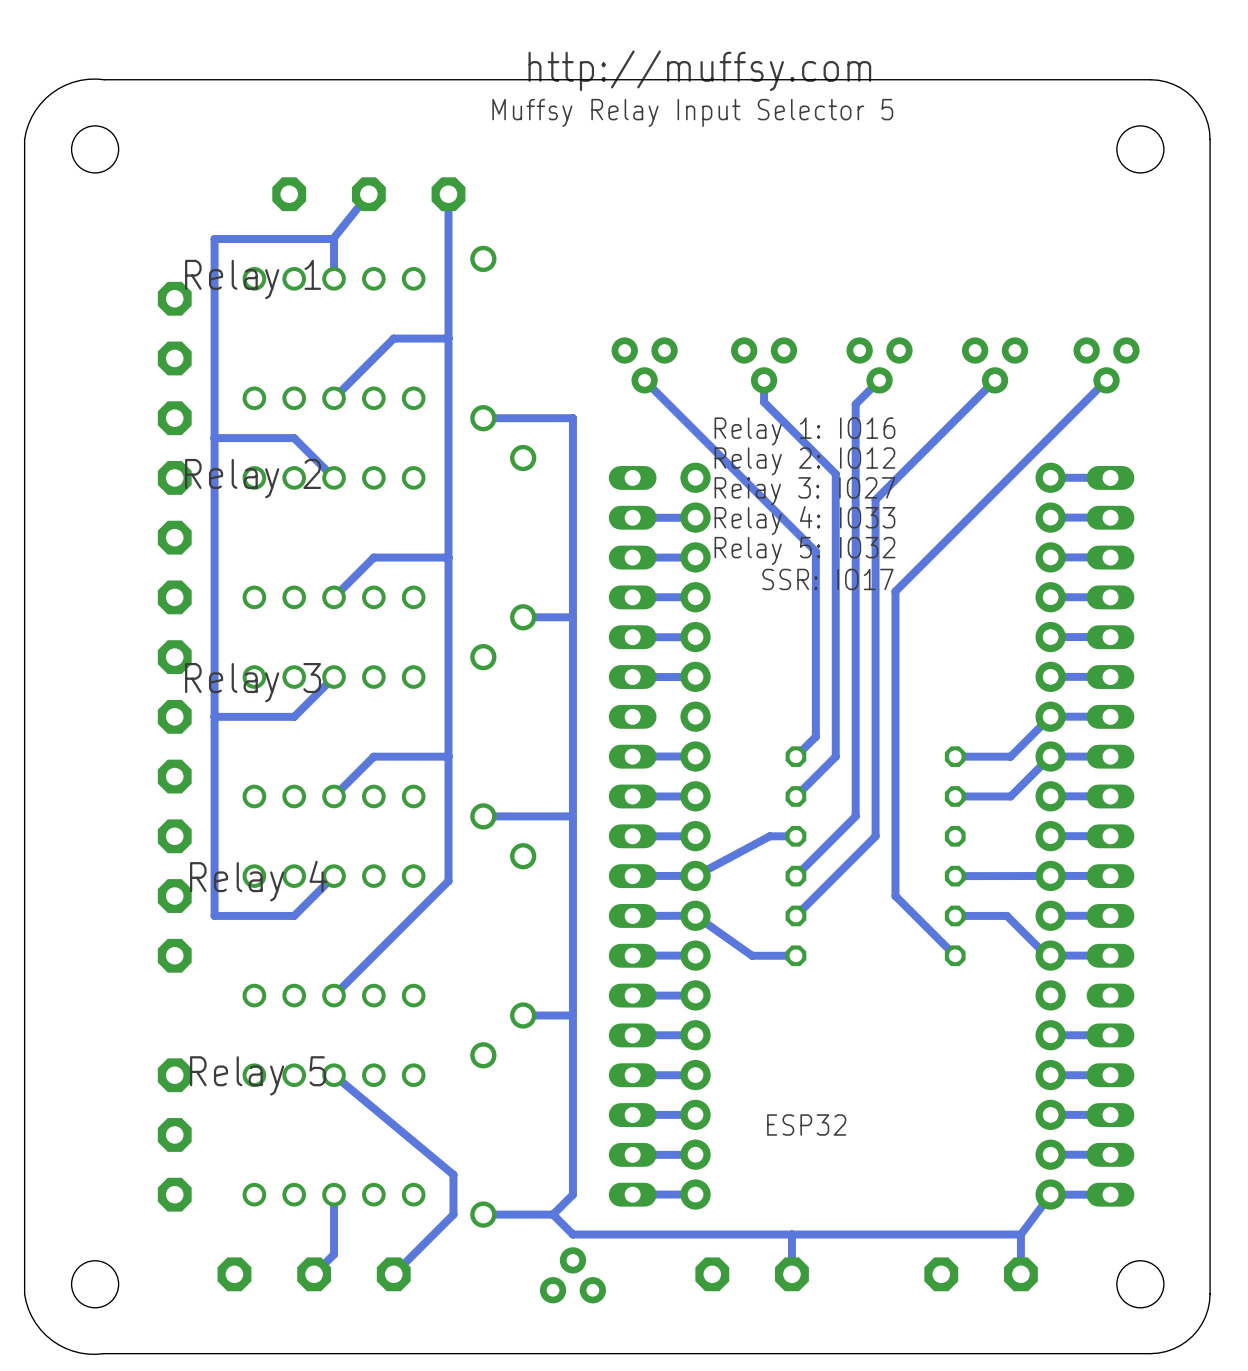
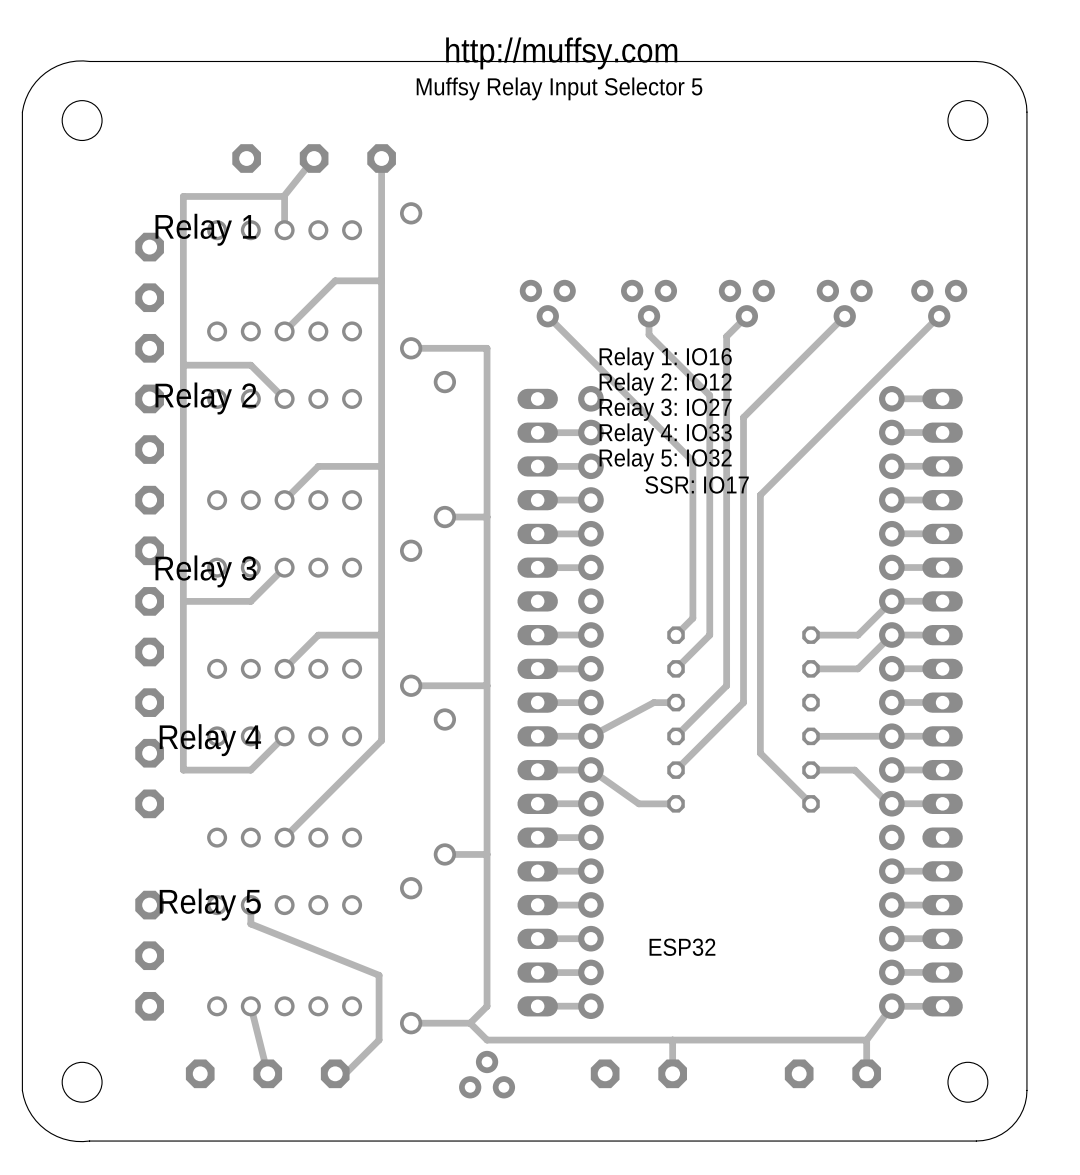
track: (334, 1075) (453, 1174) (453, 1214) (393, 1274) -> (250, 905) (250, 923) (379, 975) (379, 1040) (345, 1073) (335, 1073)
track: (334, 1194) (334, 1254) (314, 1274) -> (250, 1006) (267, 1073)

